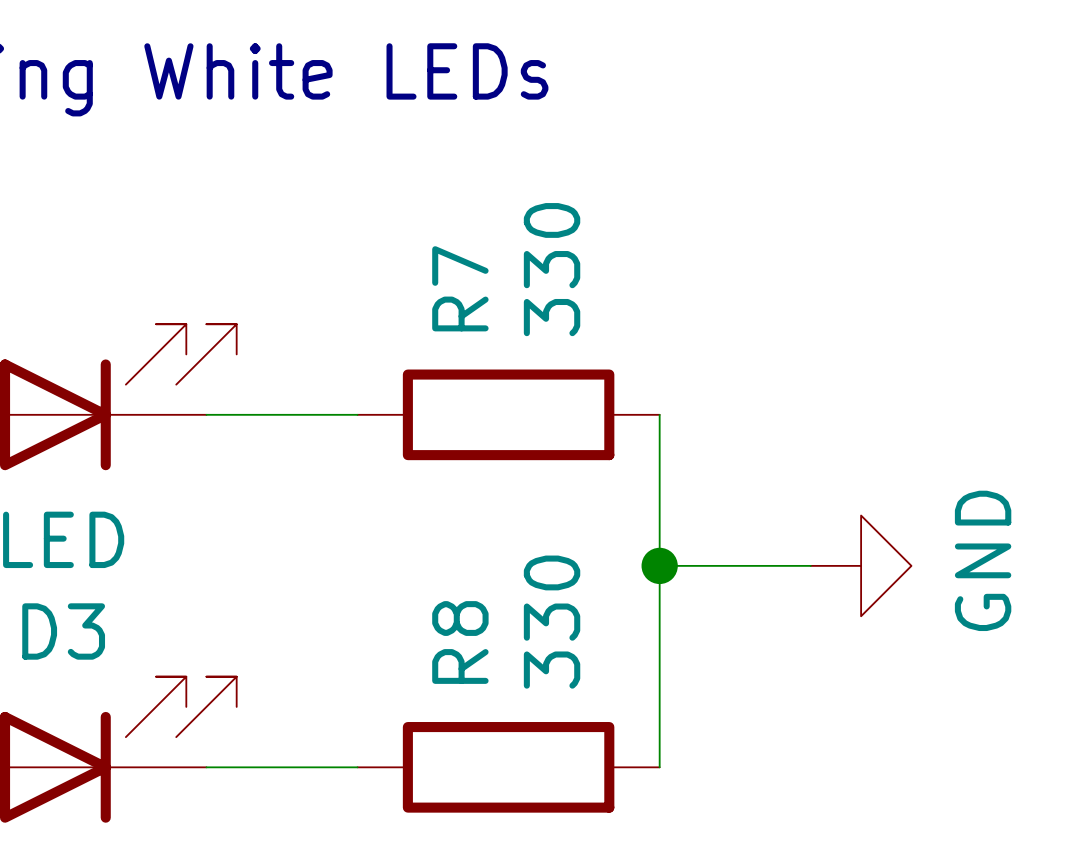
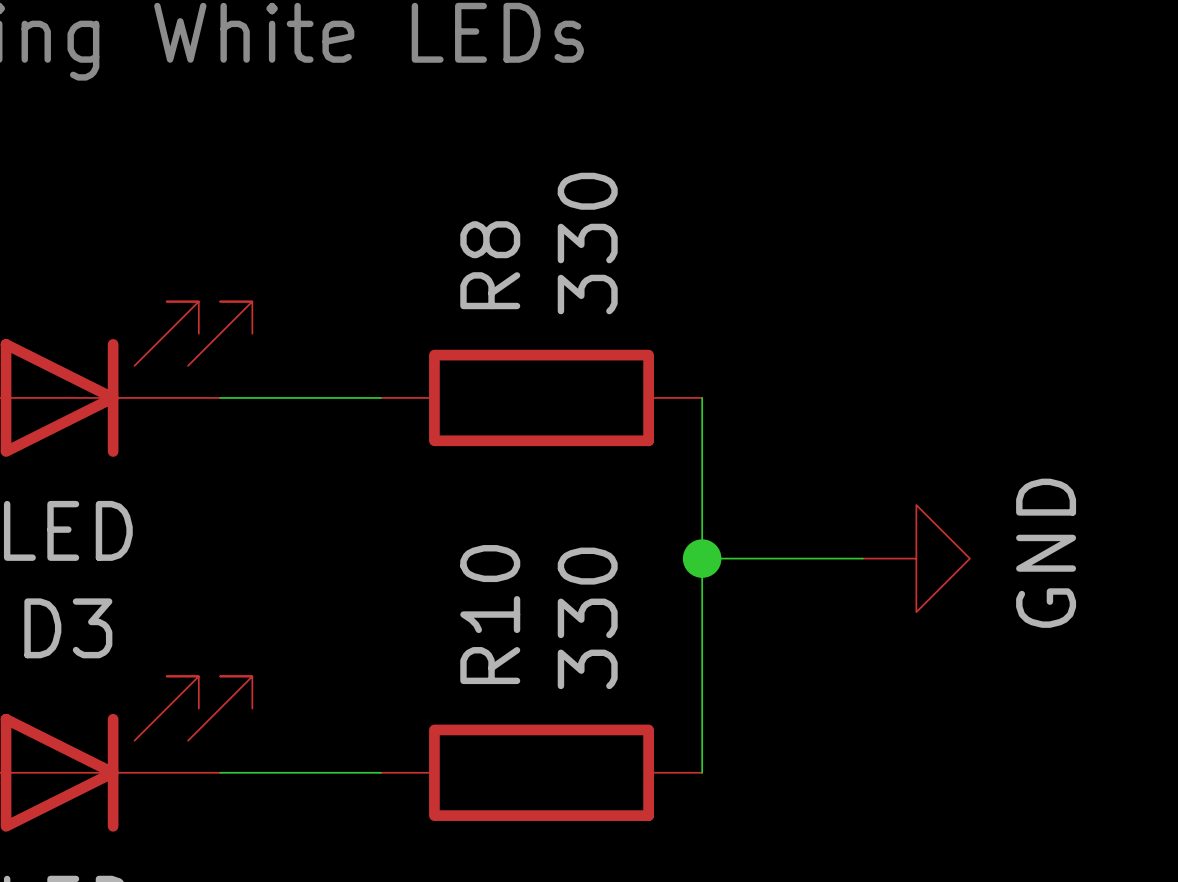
R7 name: R7 (460, 288) -> R8 (490, 265)
R8 name: R8 (460, 642) -> R10 (490, 614)

